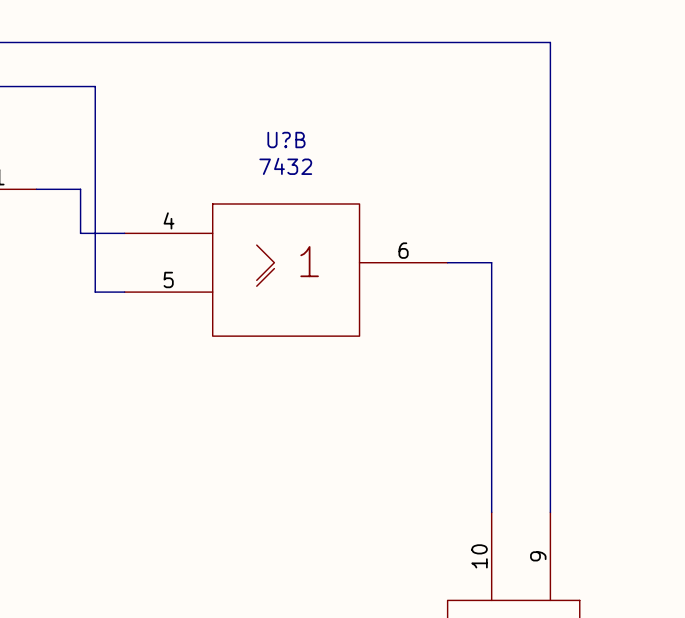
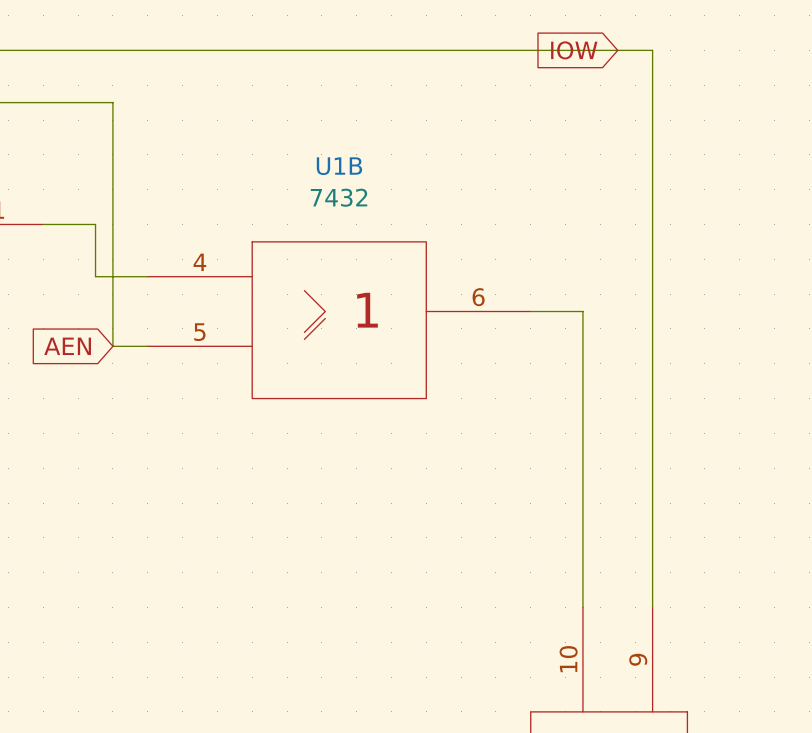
global label: none -> IOW (574, 50)
U?B name: U?B (286, 140) -> U1B (339, 166)
global label: none -> AEN (67, 346)

